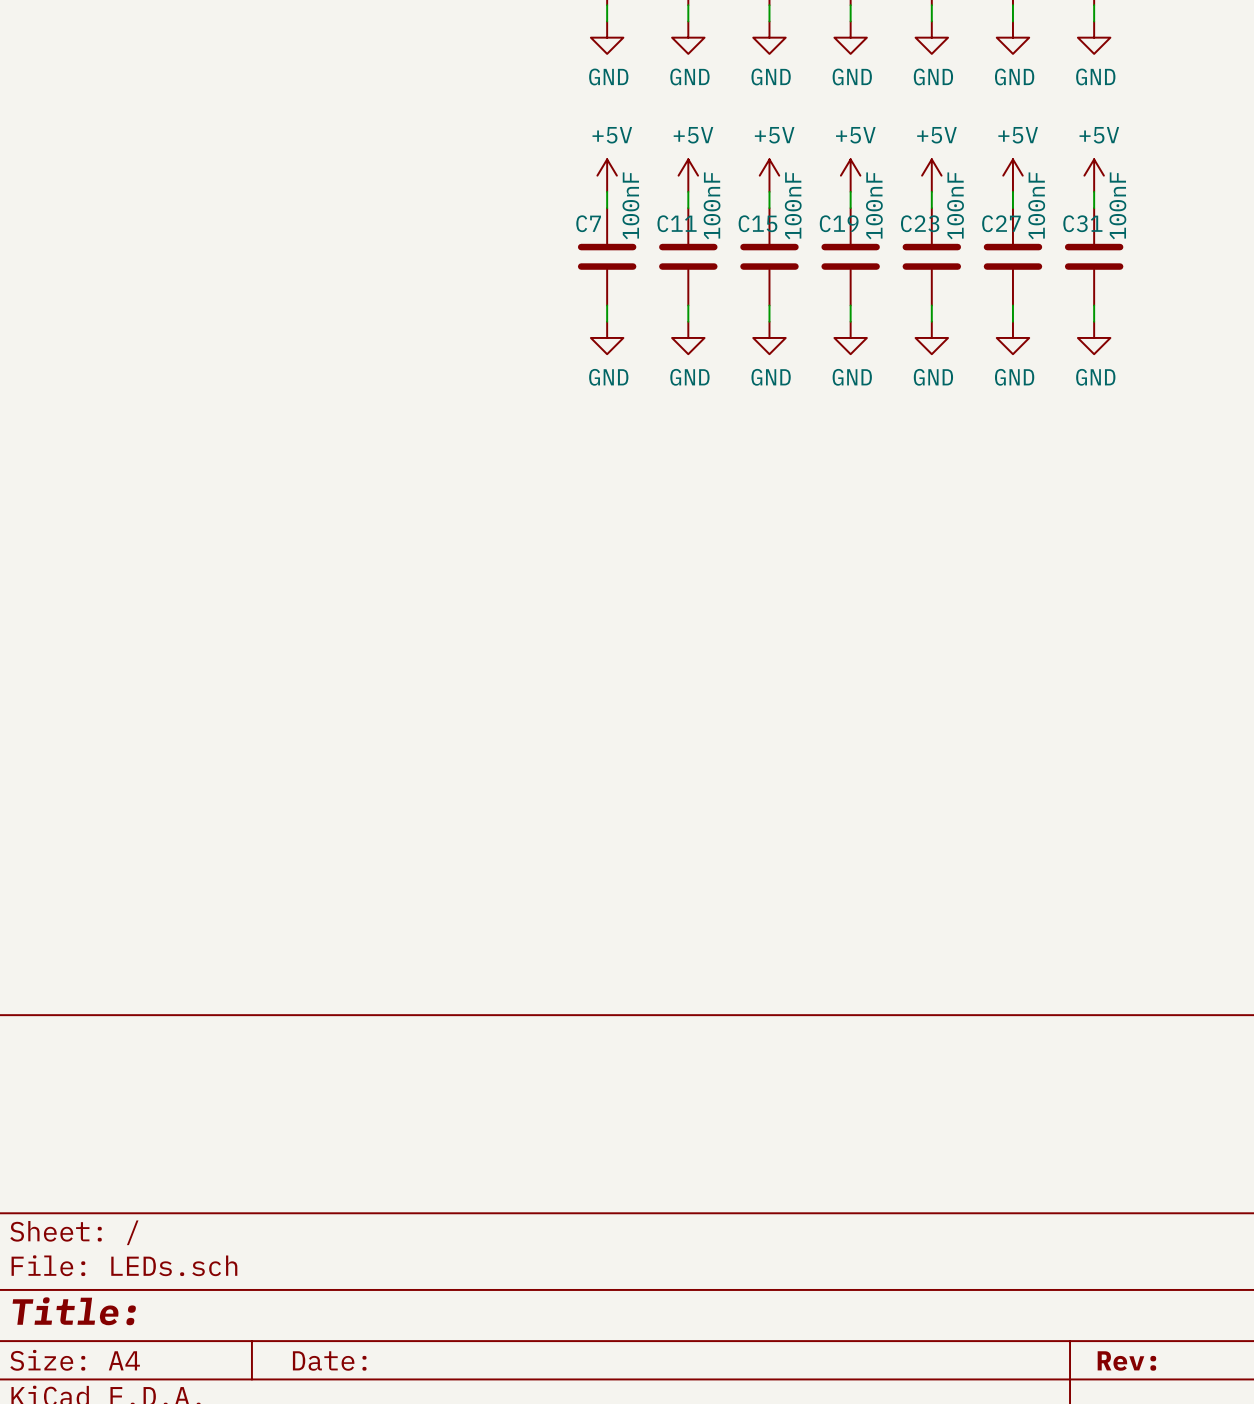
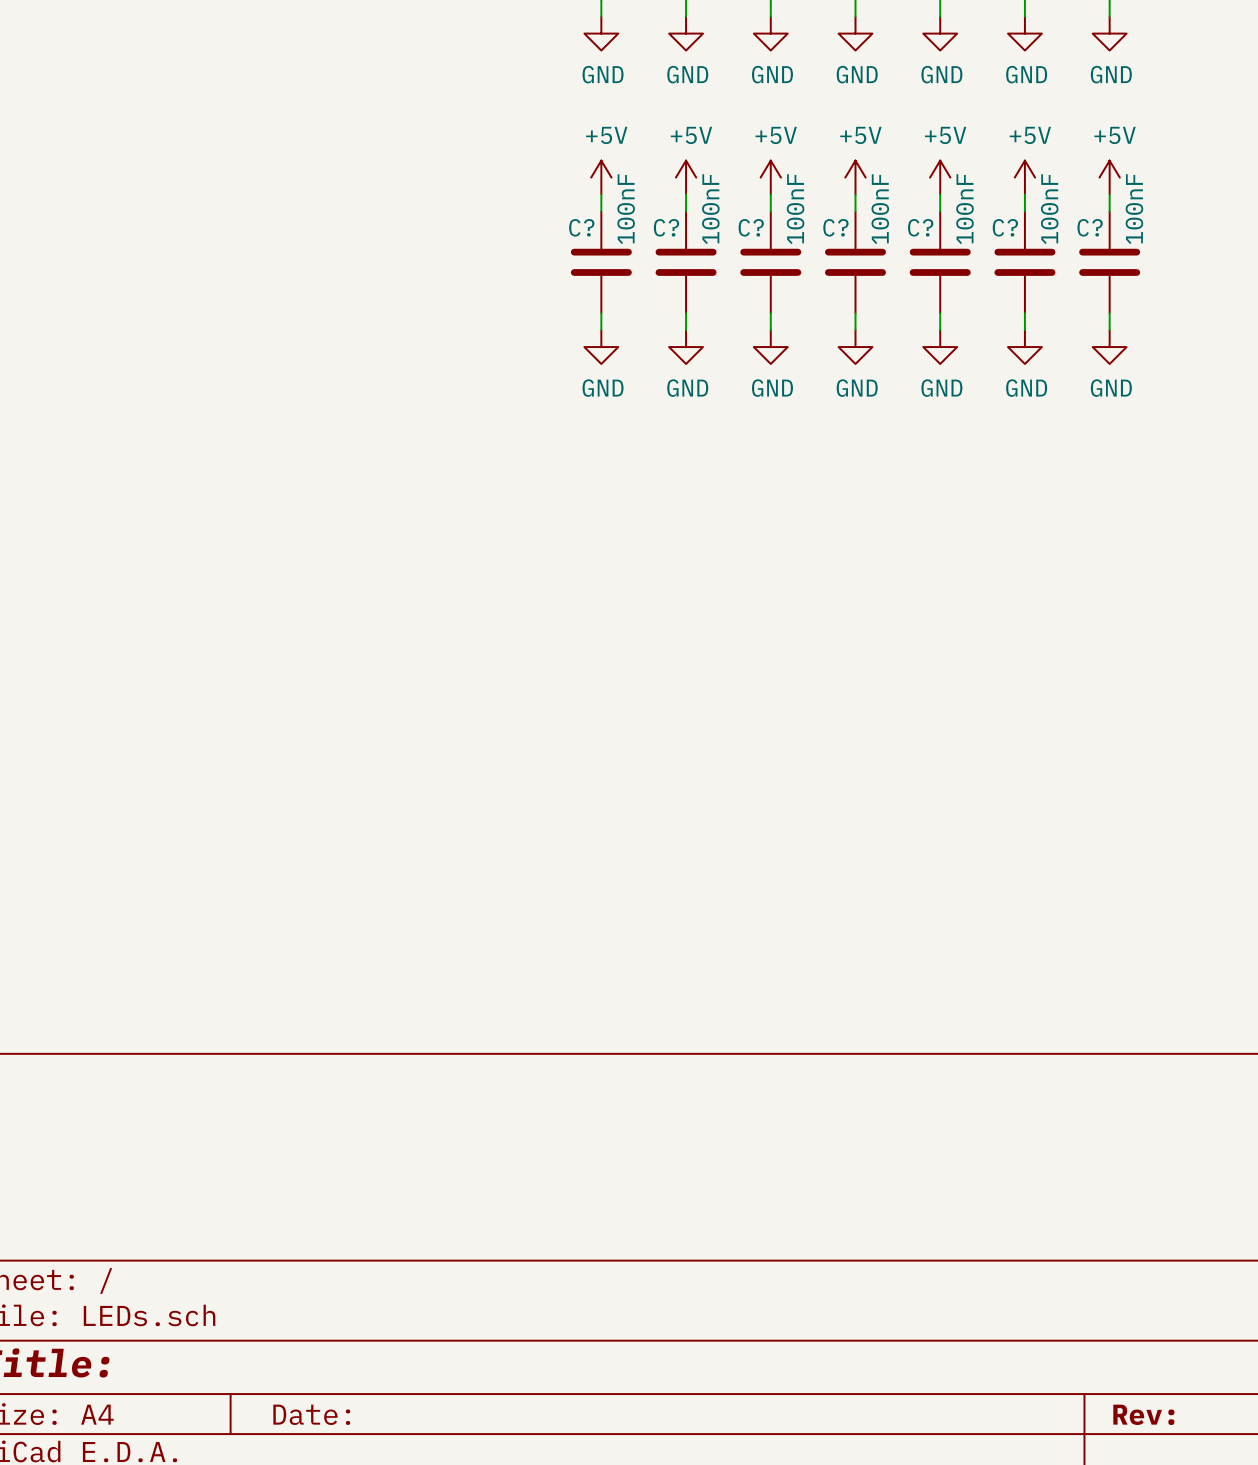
C7 name: C7 (588, 223) -> C? (581, 227)
C11 name: C11 (677, 223) -> C? (666, 227)
C15 name: C15 (757, 223) -> C? (751, 227)
C19 name: C19 (839, 223) -> C? (835, 227)
C23 name: C23 (920, 223) -> C? (920, 227)
C27 name: C27 (1001, 223) -> C? (1005, 227)
C31 name: C31 (1082, 223) -> C? (1090, 227)

